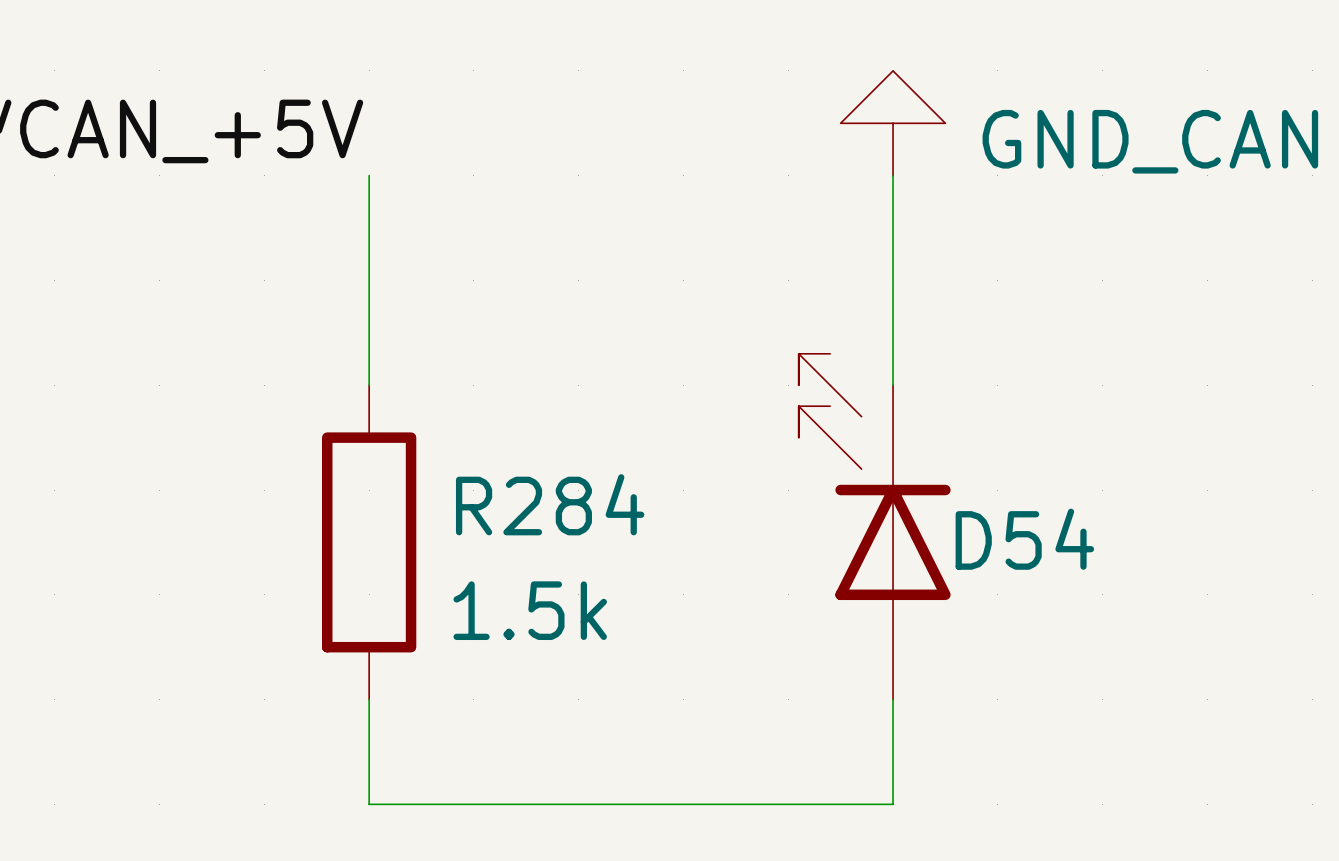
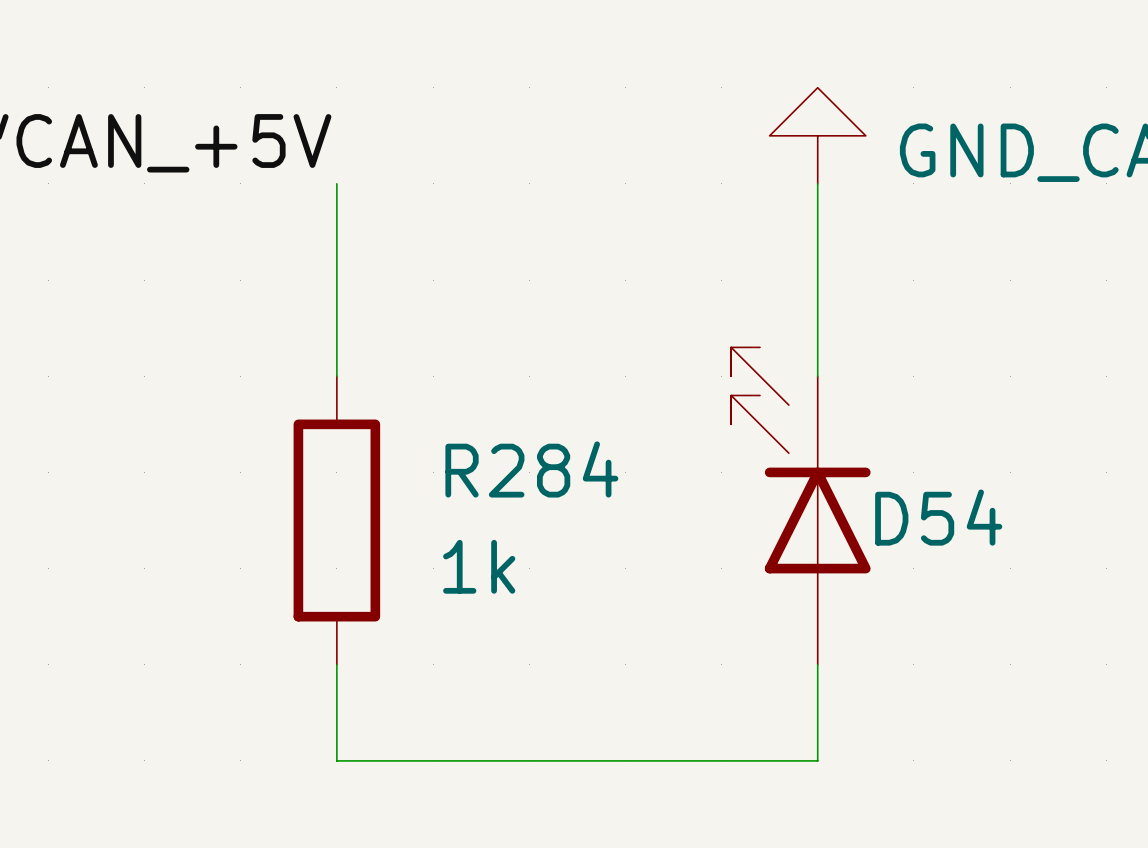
R284 name position: R284 (550, 504) -> R284 (531, 469)
R284 value: 1.5k (530, 610) -> 1k (479, 566)

